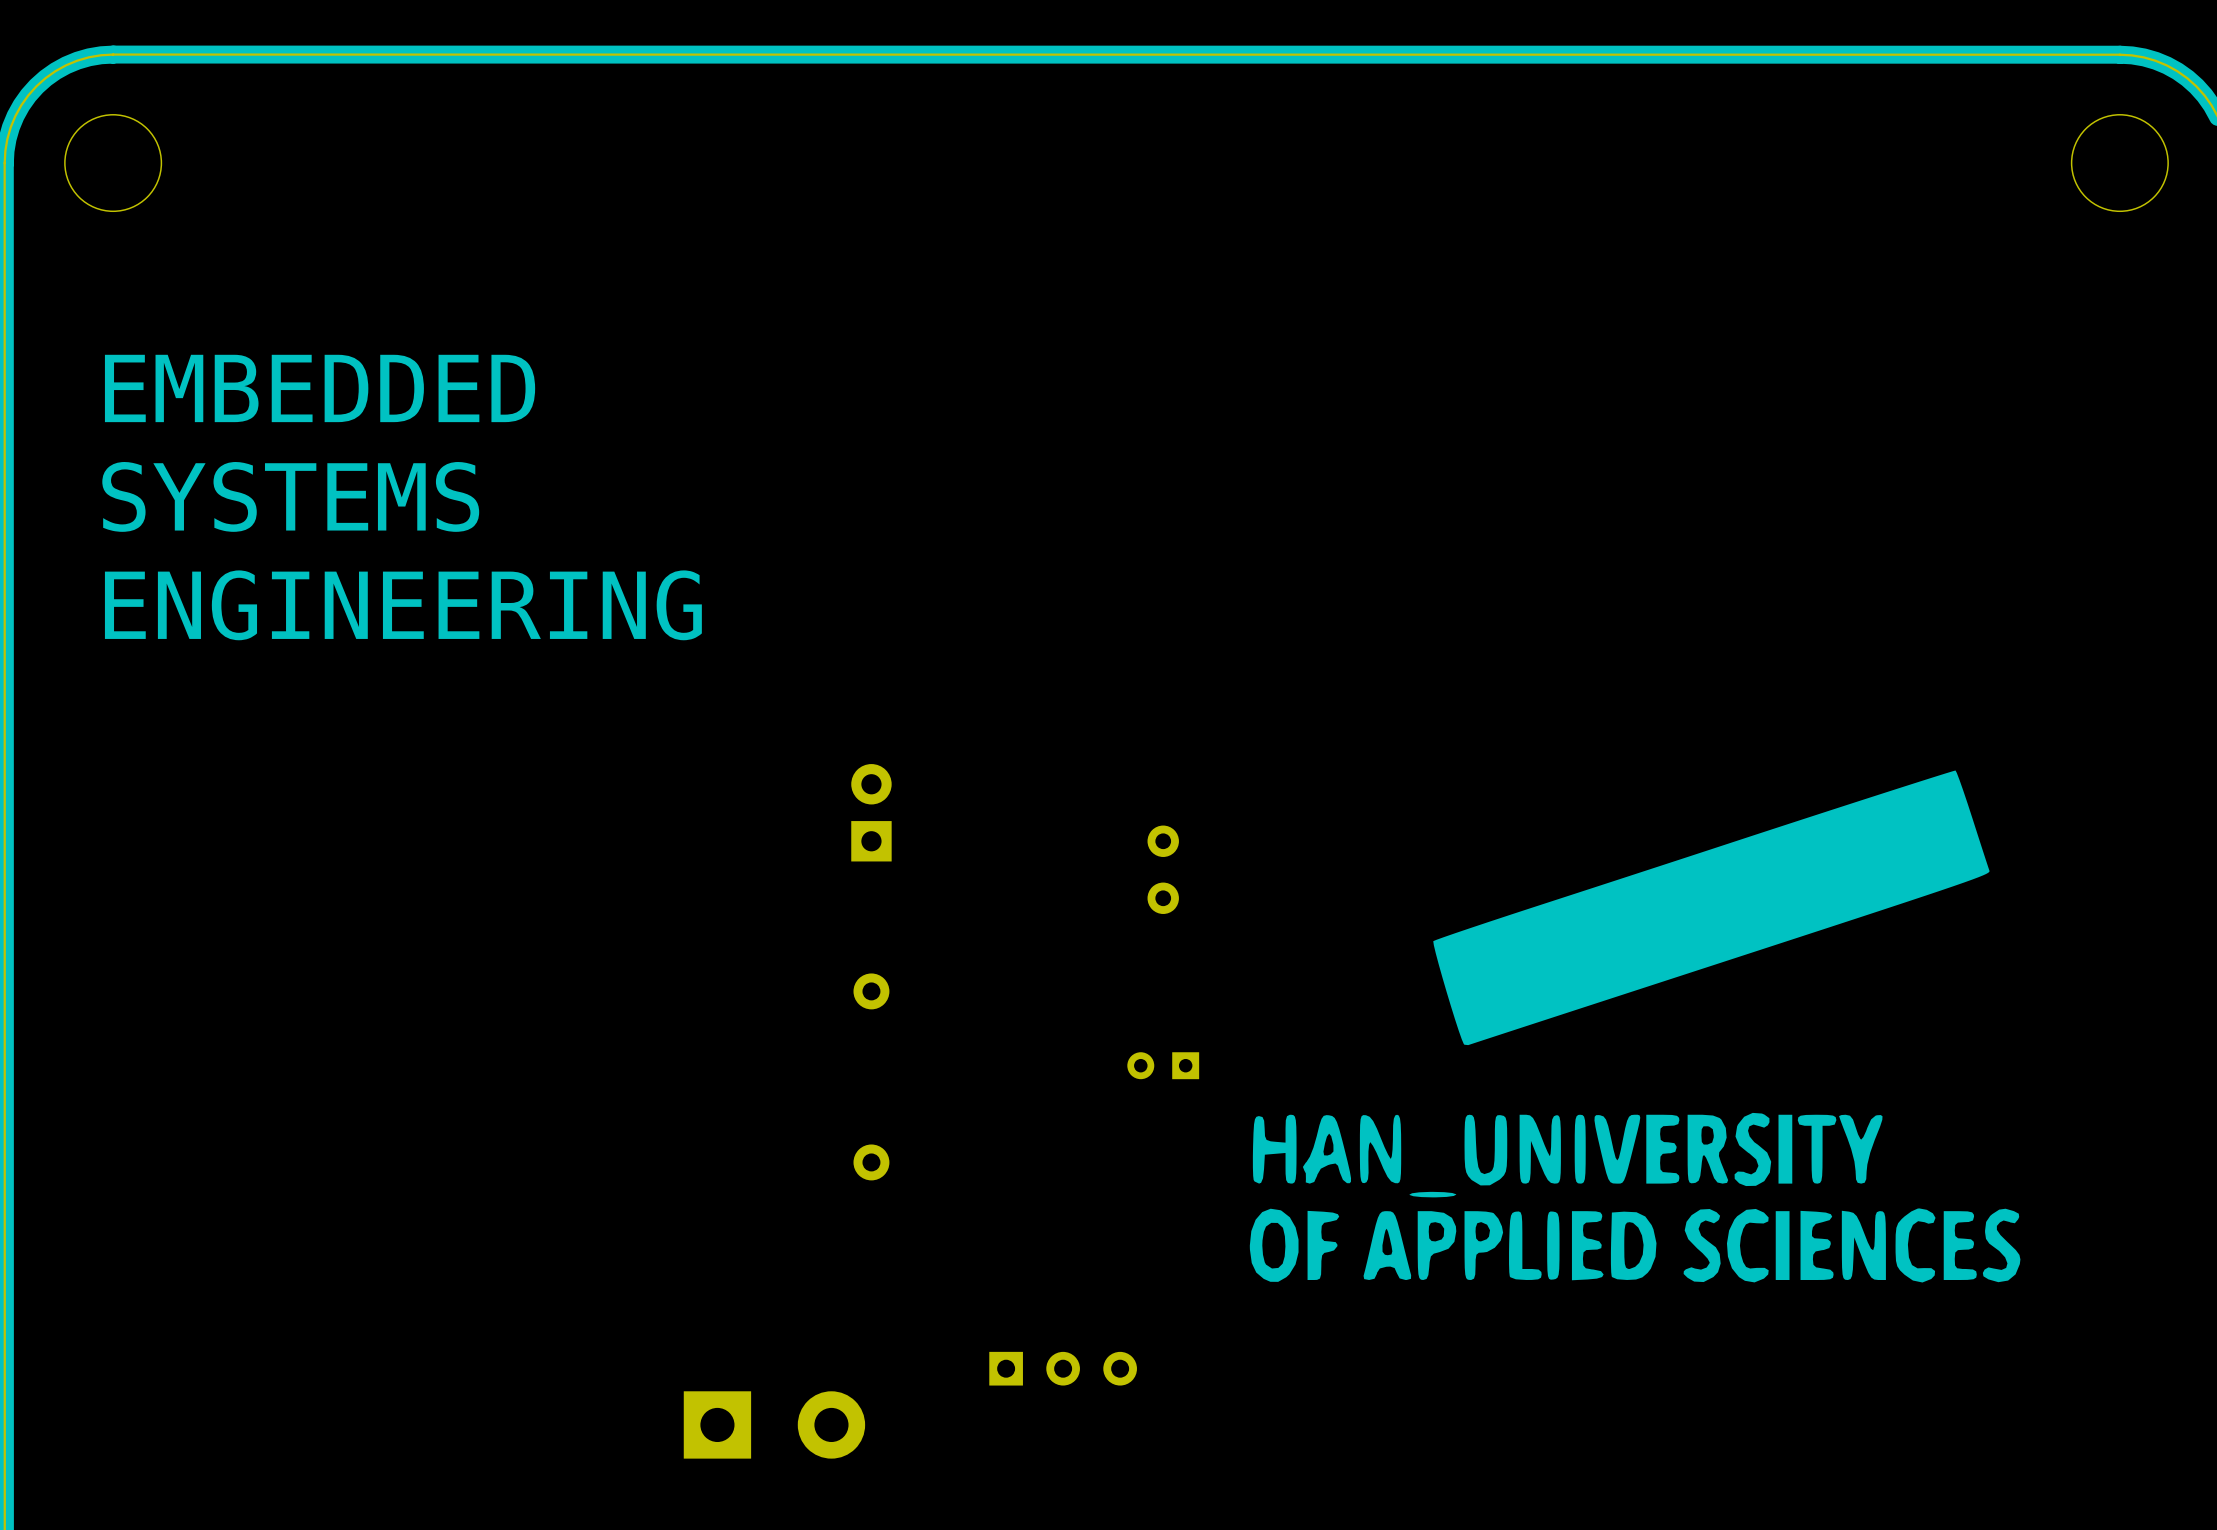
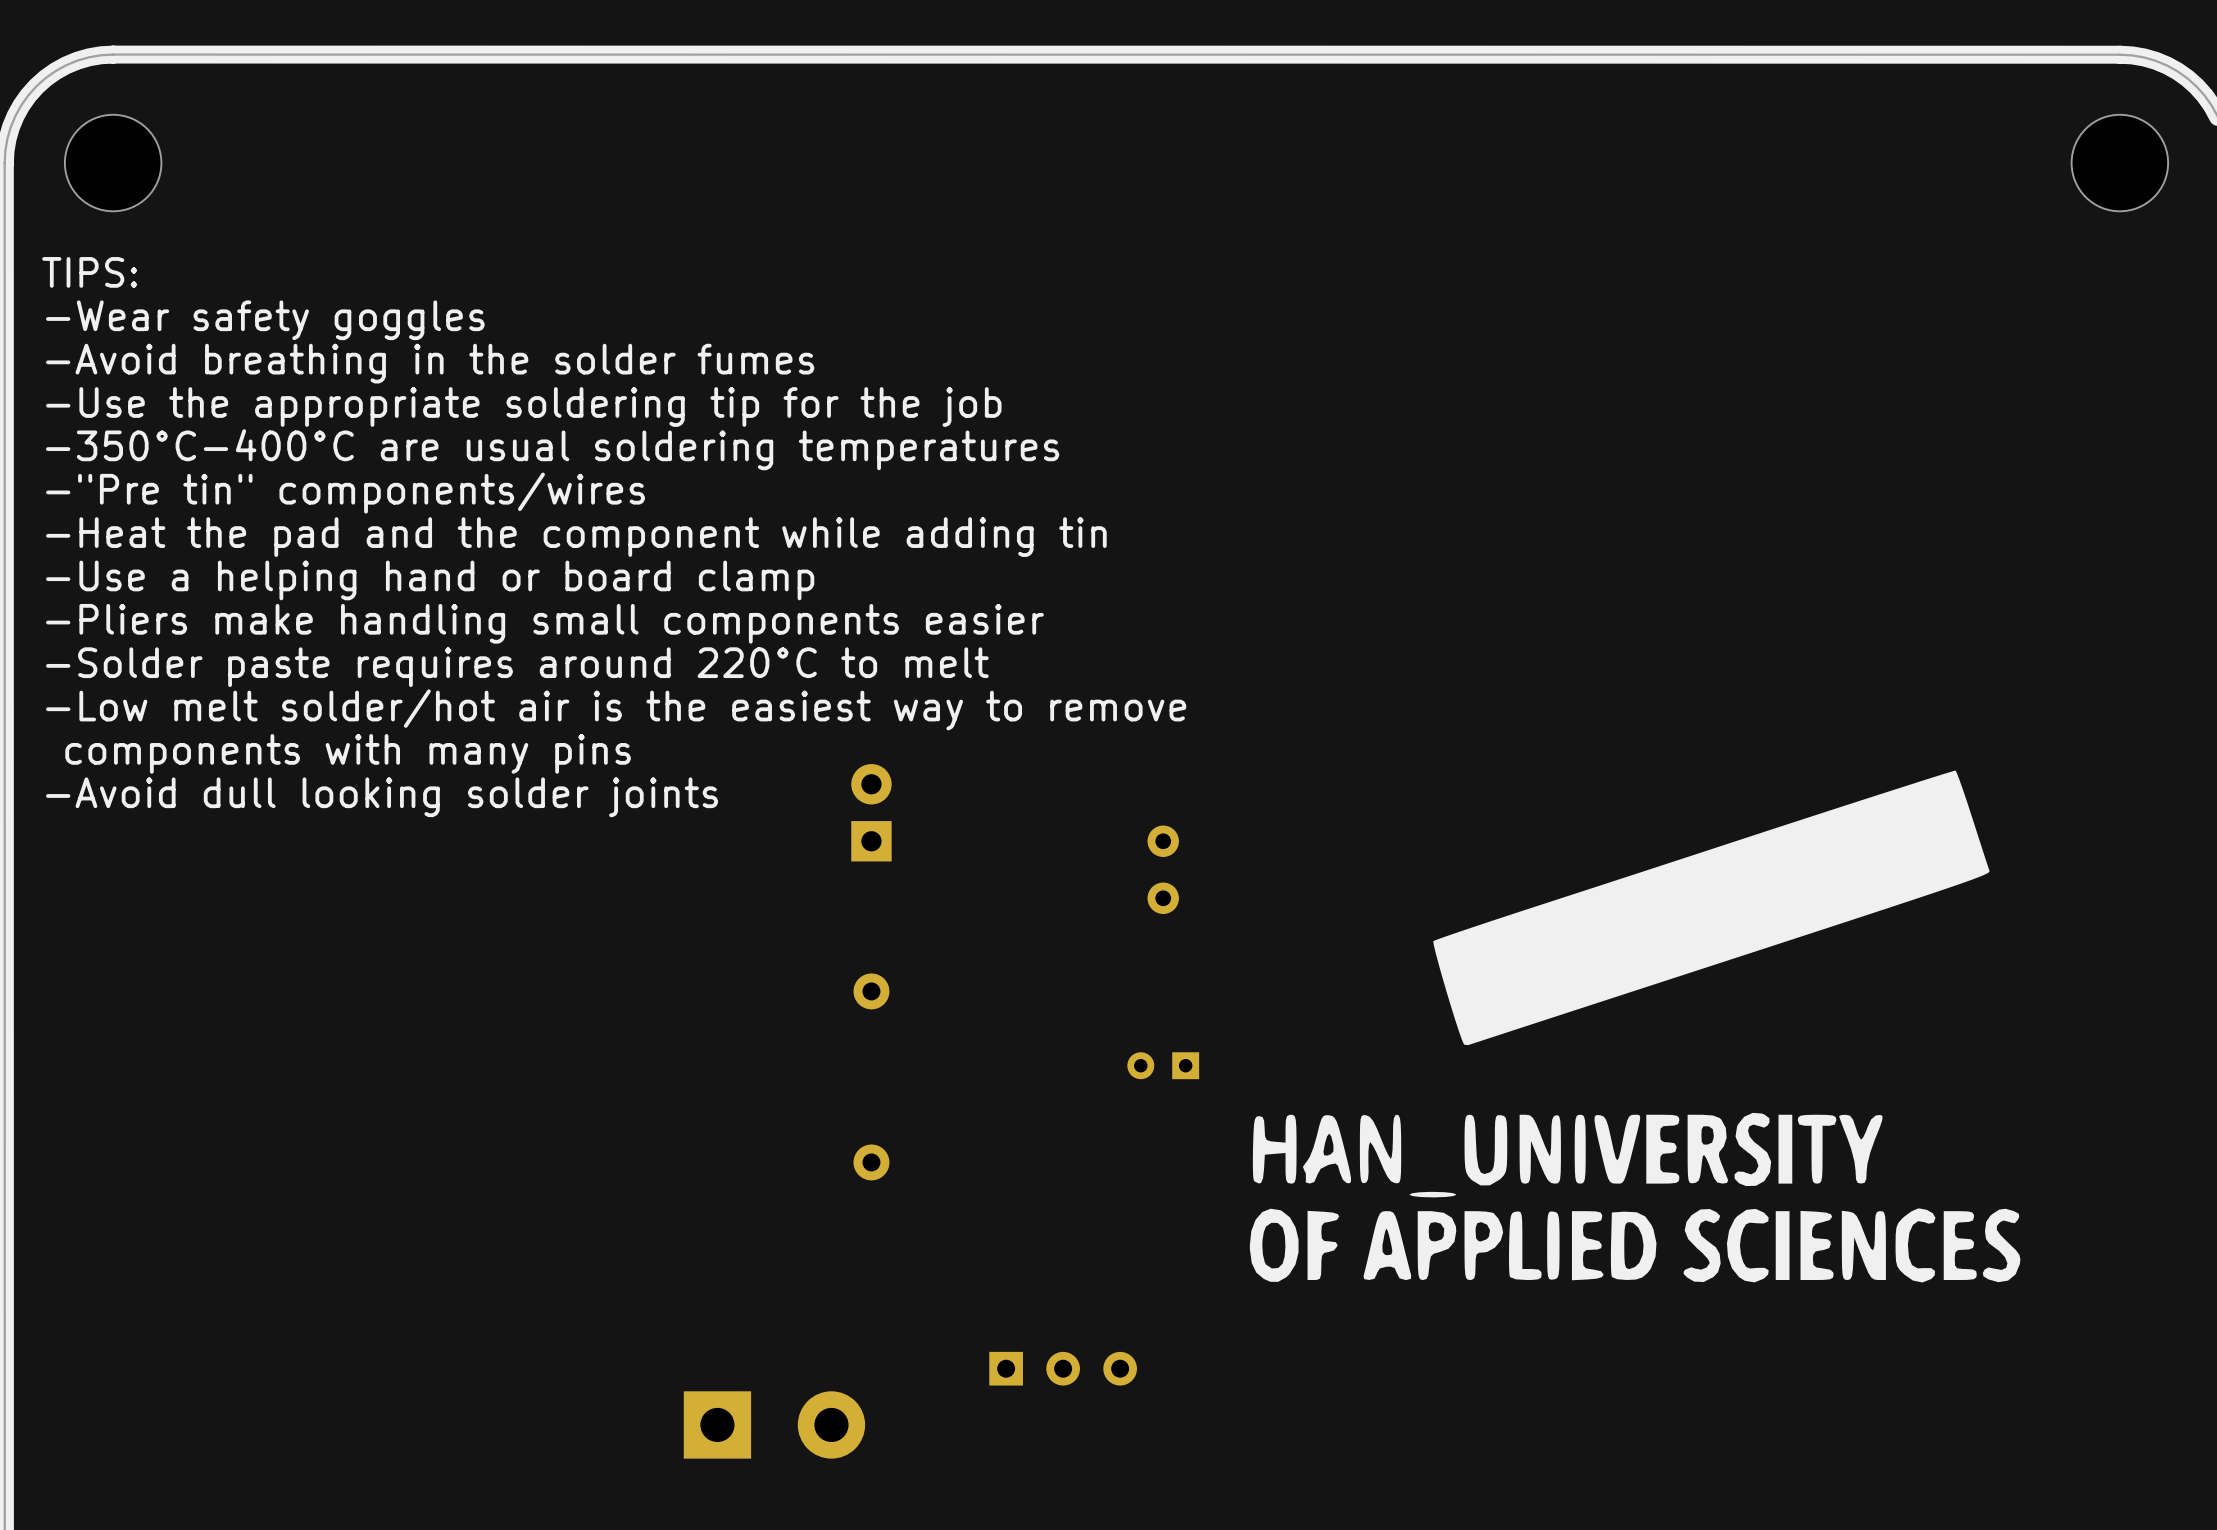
text: none -> TIPS: (89, 272)
text: none -> -Wear safety goggles (265, 320)
text: none -> -Avoid breathing in the solder fumes (430, 363)
text: EMBEDDED (320, 388) -> none
text: none -> -Use the appropriate soldering tip for the job (523, 406)
text: none -> -350°C-400°C are usual soldering temperatures (552, 449)
text: none -> -"Pre tin" components/wires (345, 493)
text: SYSTEMS (290, 496) -> none
text: none -> -Heat the pad and the component while adding tin (576, 537)
text: none -> -Use a helping hand or board clamp (430, 580)
text: ENGINEERING (403, 605) -> none
text: none -> -Pliers make handling small components easier (544, 623)
text: none -> -Solder paste requires around 220°C to melt (517, 667)
text: none -> -Low melt solder/hot air is the easiest way to remove (616, 709)
text: none -> components with many pins (348, 753)
text: none -> -Avoid dull looking solder joints (382, 797)

